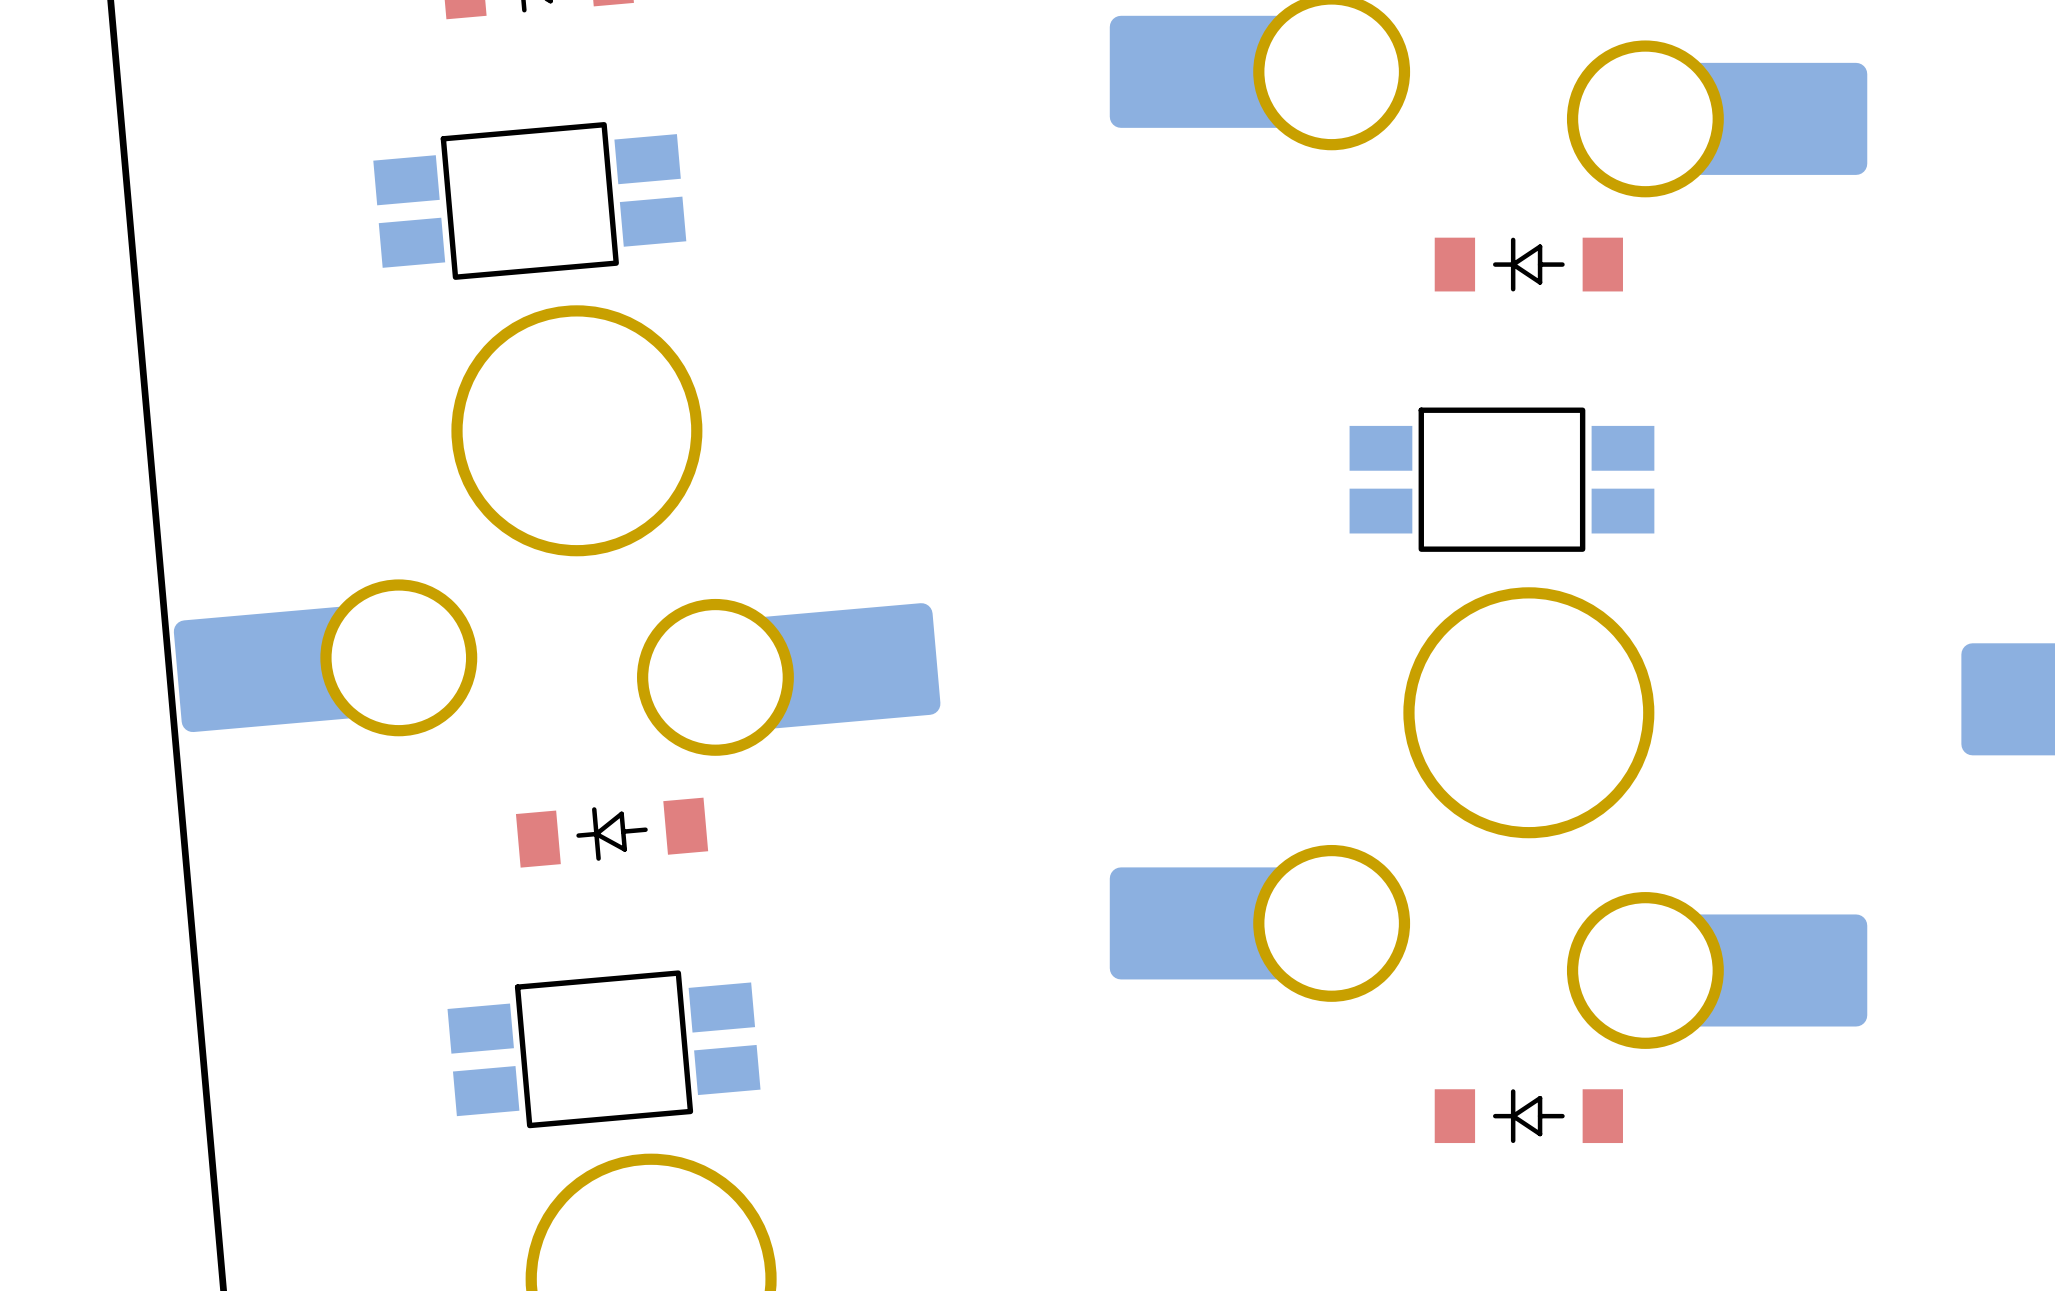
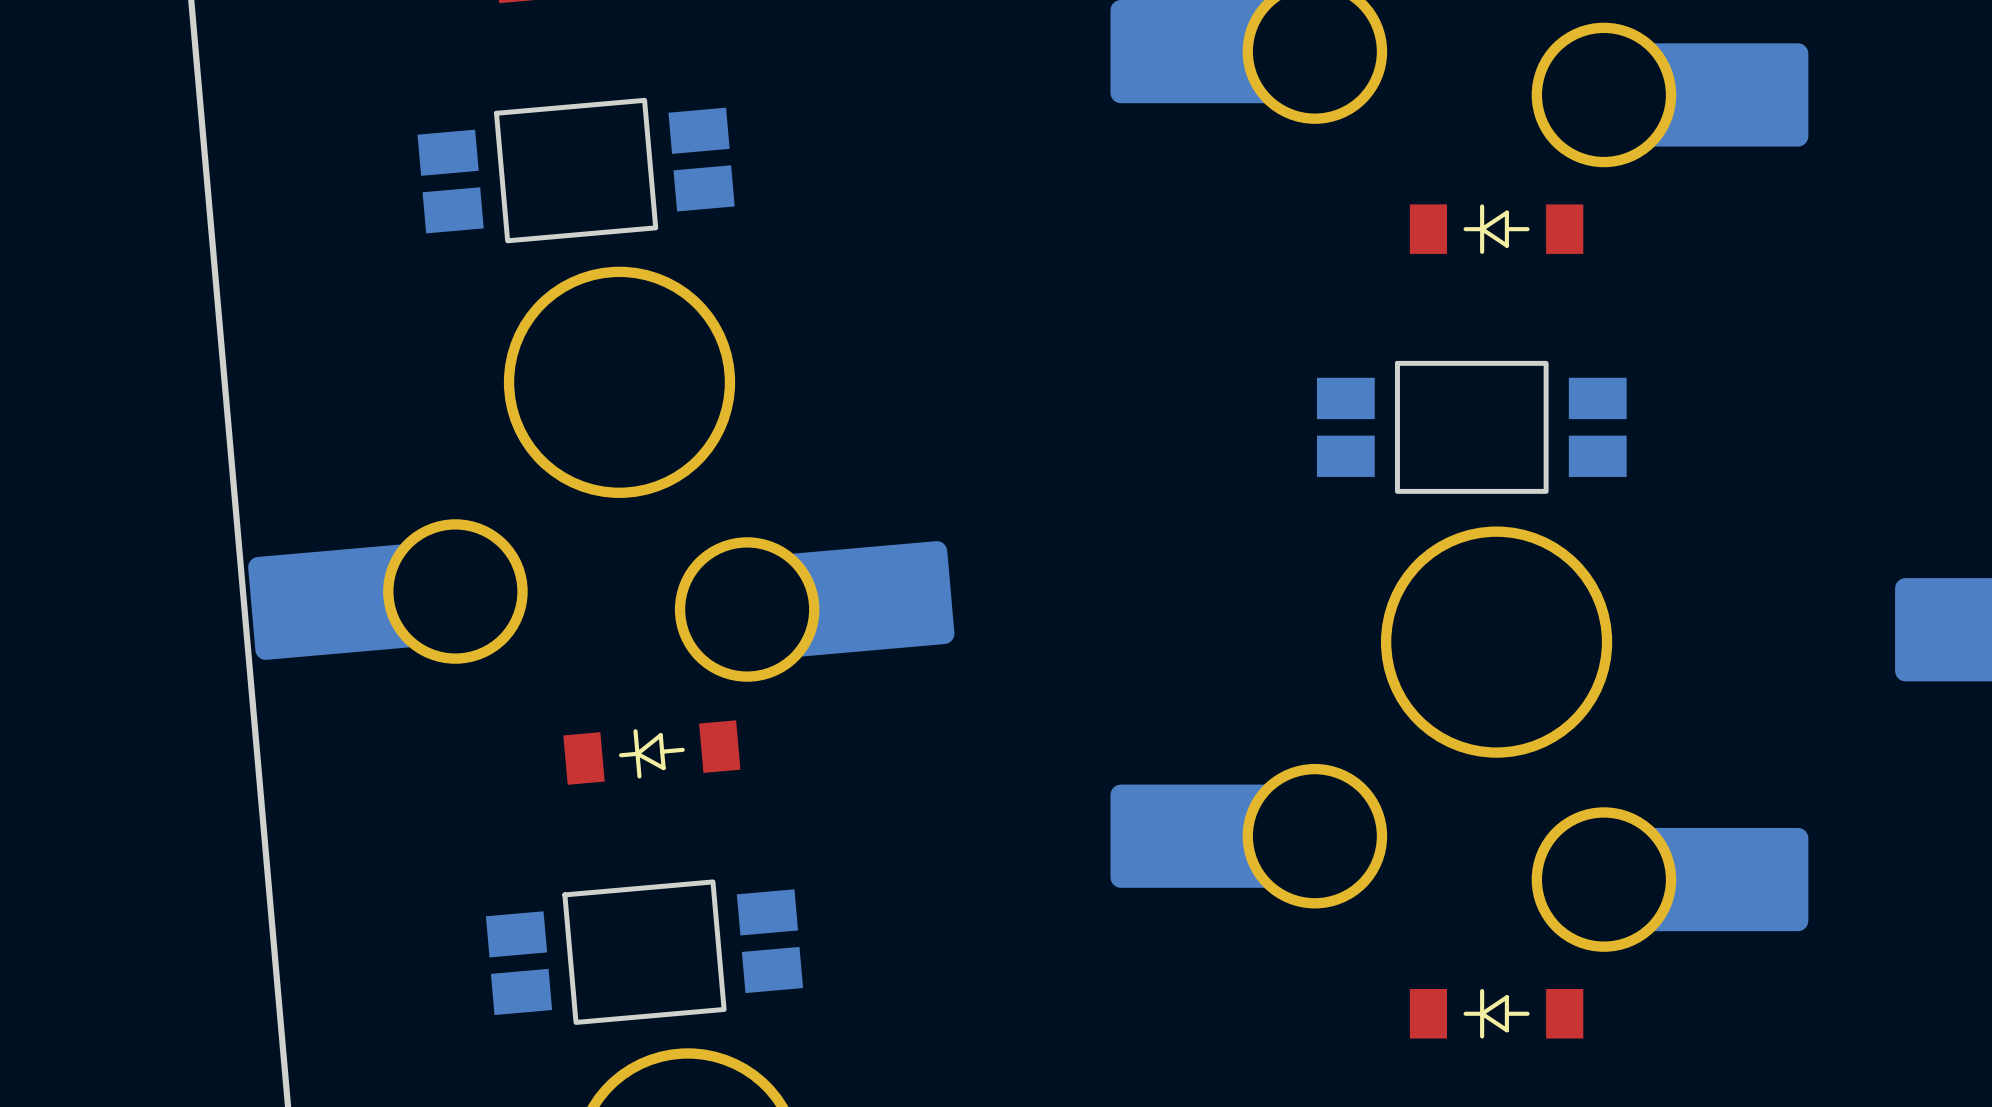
part footprint: [373, 122, 687, 280] -> [417, 97, 735, 244]
part footprint: [1349, 407, 1655, 552] -> [1316, 360, 1627, 494]
part footprint: [447, 970, 761, 1129] -> [485, 879, 804, 1025]

